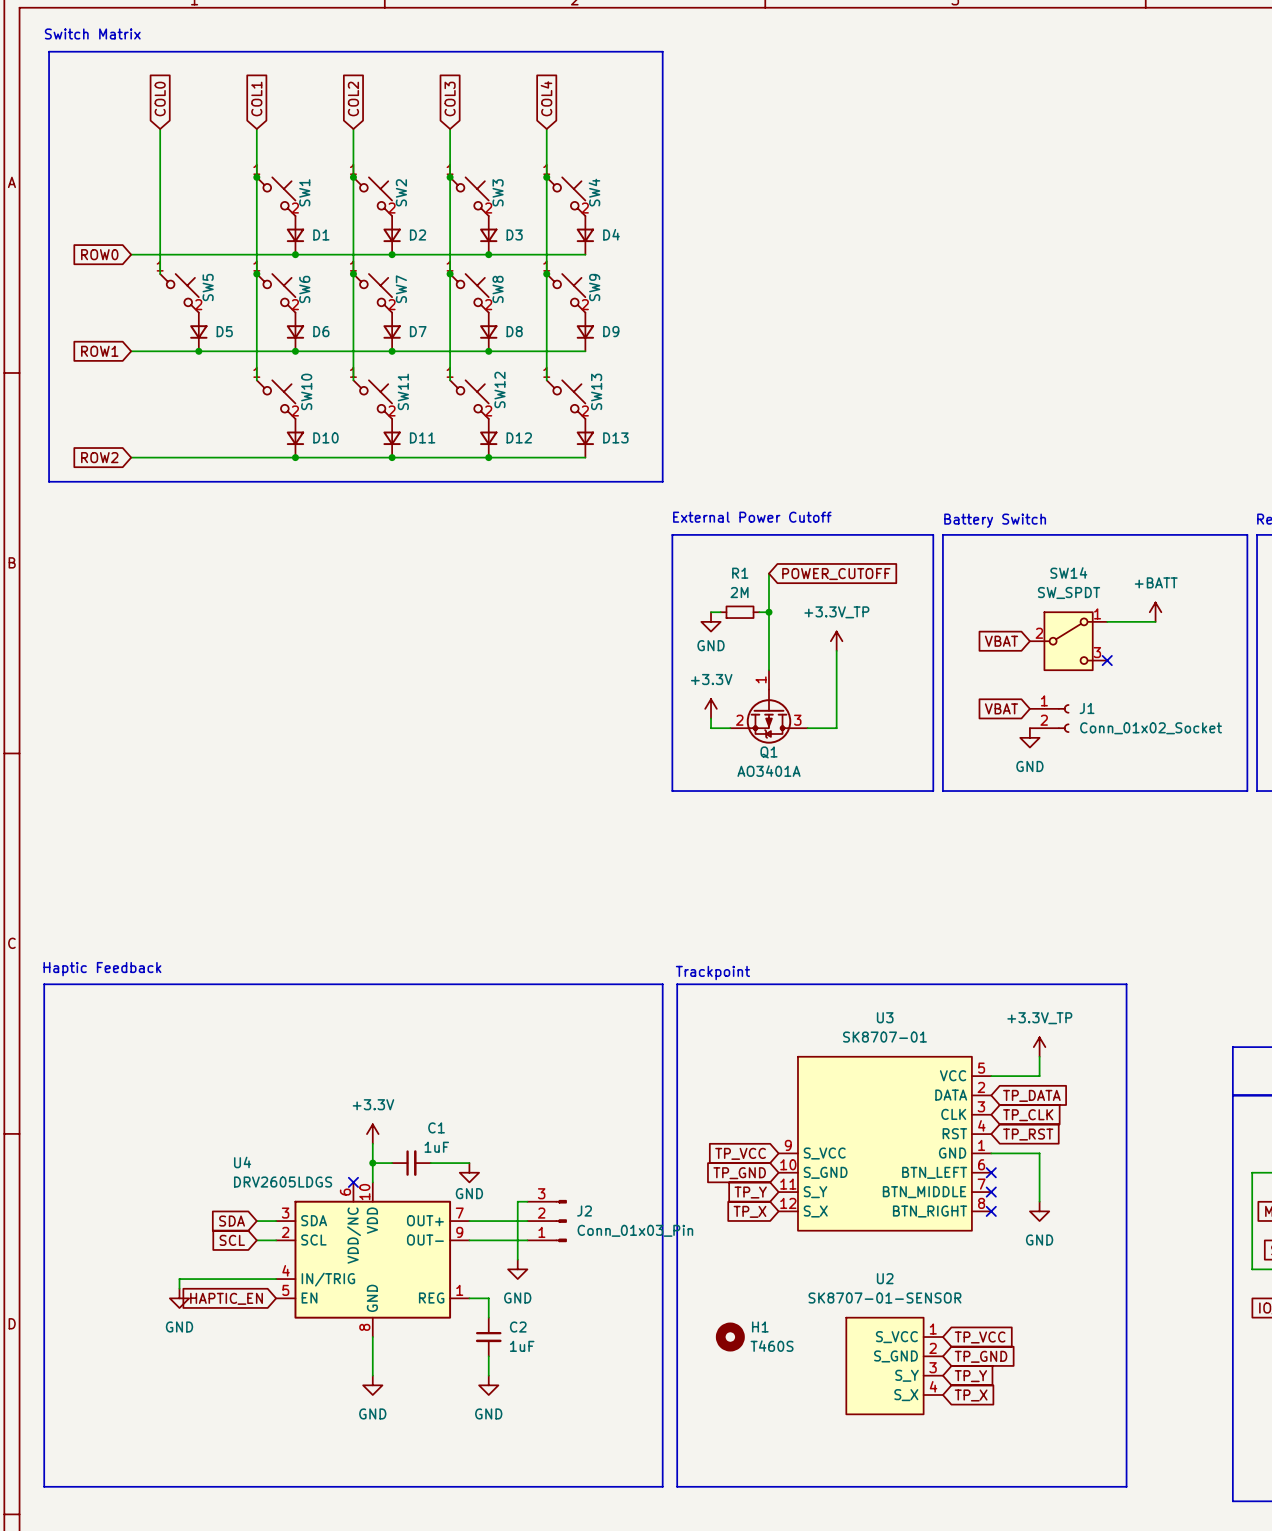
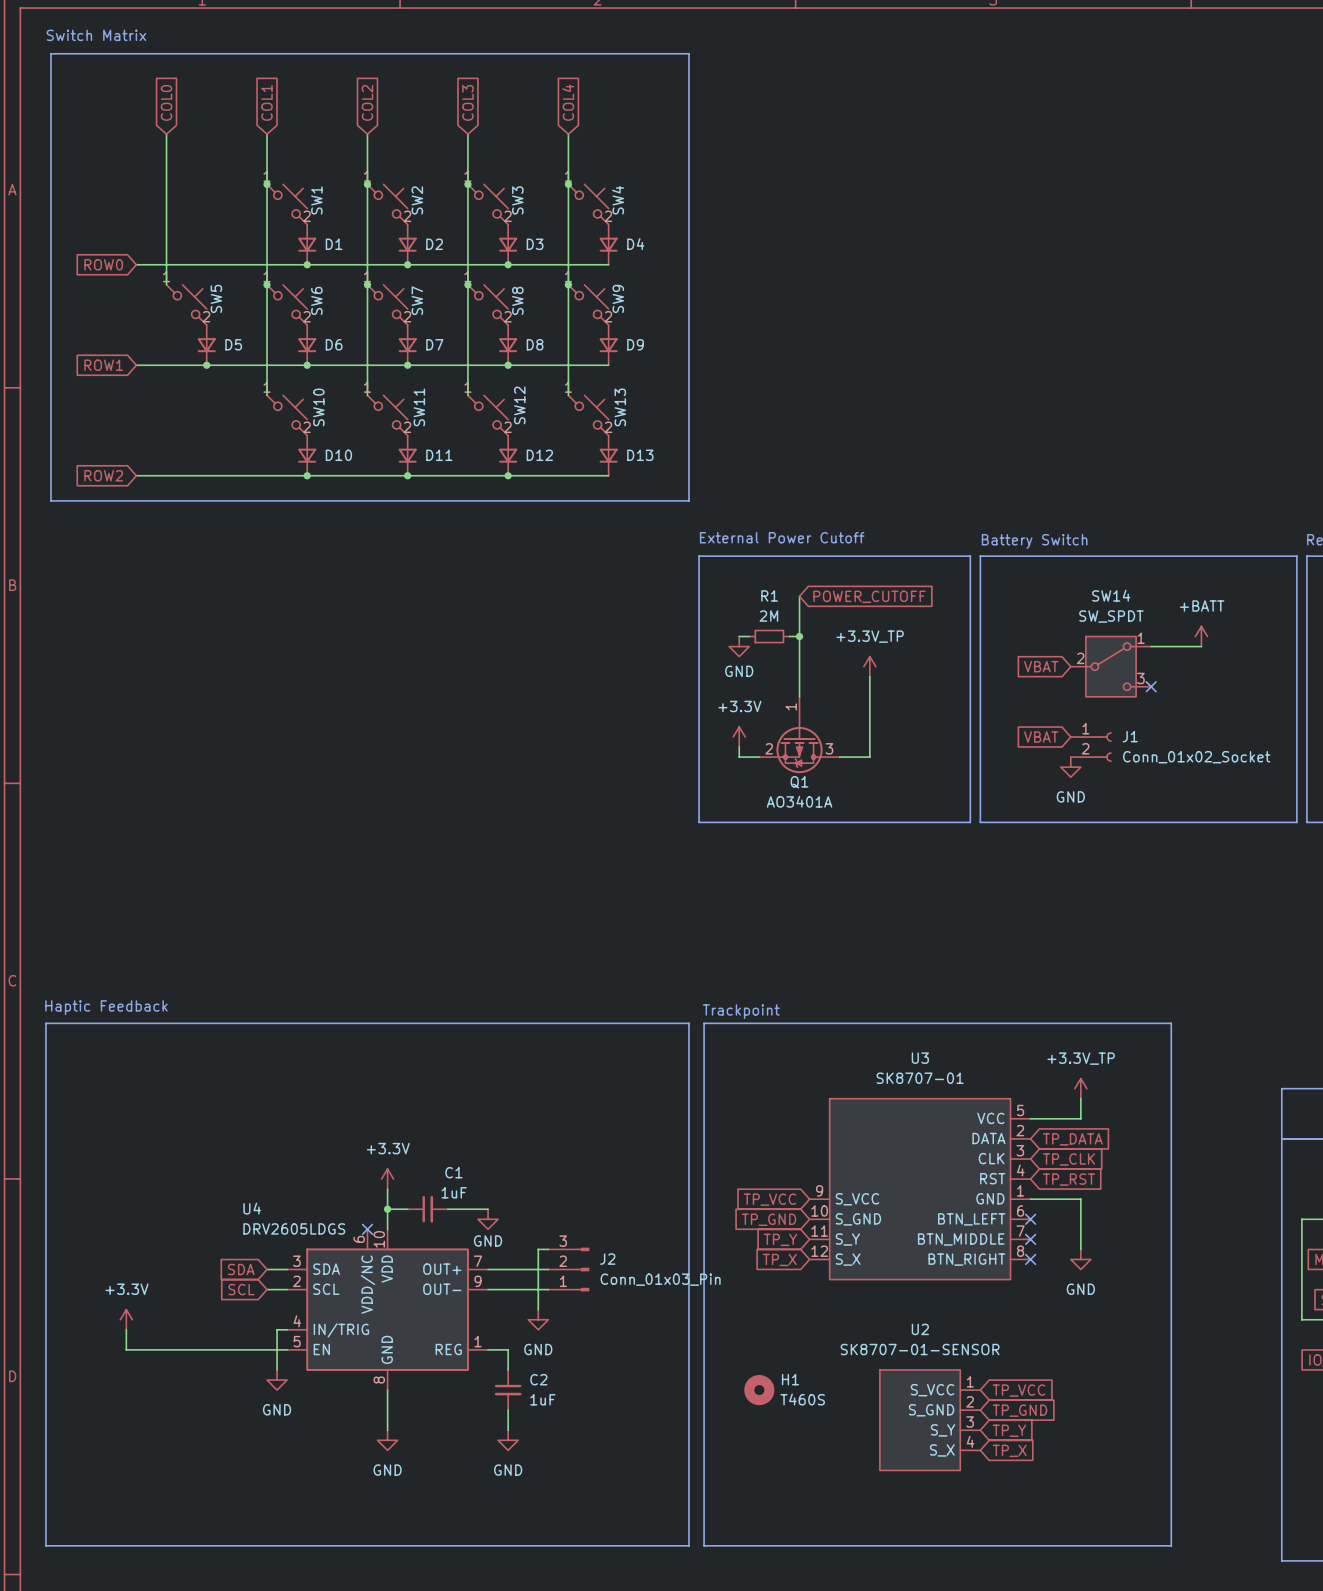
power symbol: none -> +3.3V (126, 1319)
wire: none -> (126, 1329) (126, 1349) (287, 1349)
wire: (266, 1279) (179, 1279) (179, 1288) -> (277, 1329) (277, 1369)
power symbol position: GND (179, 1298) -> GND (277, 1380)
global label: HAPTIC_EN (226, 1298) -> none

